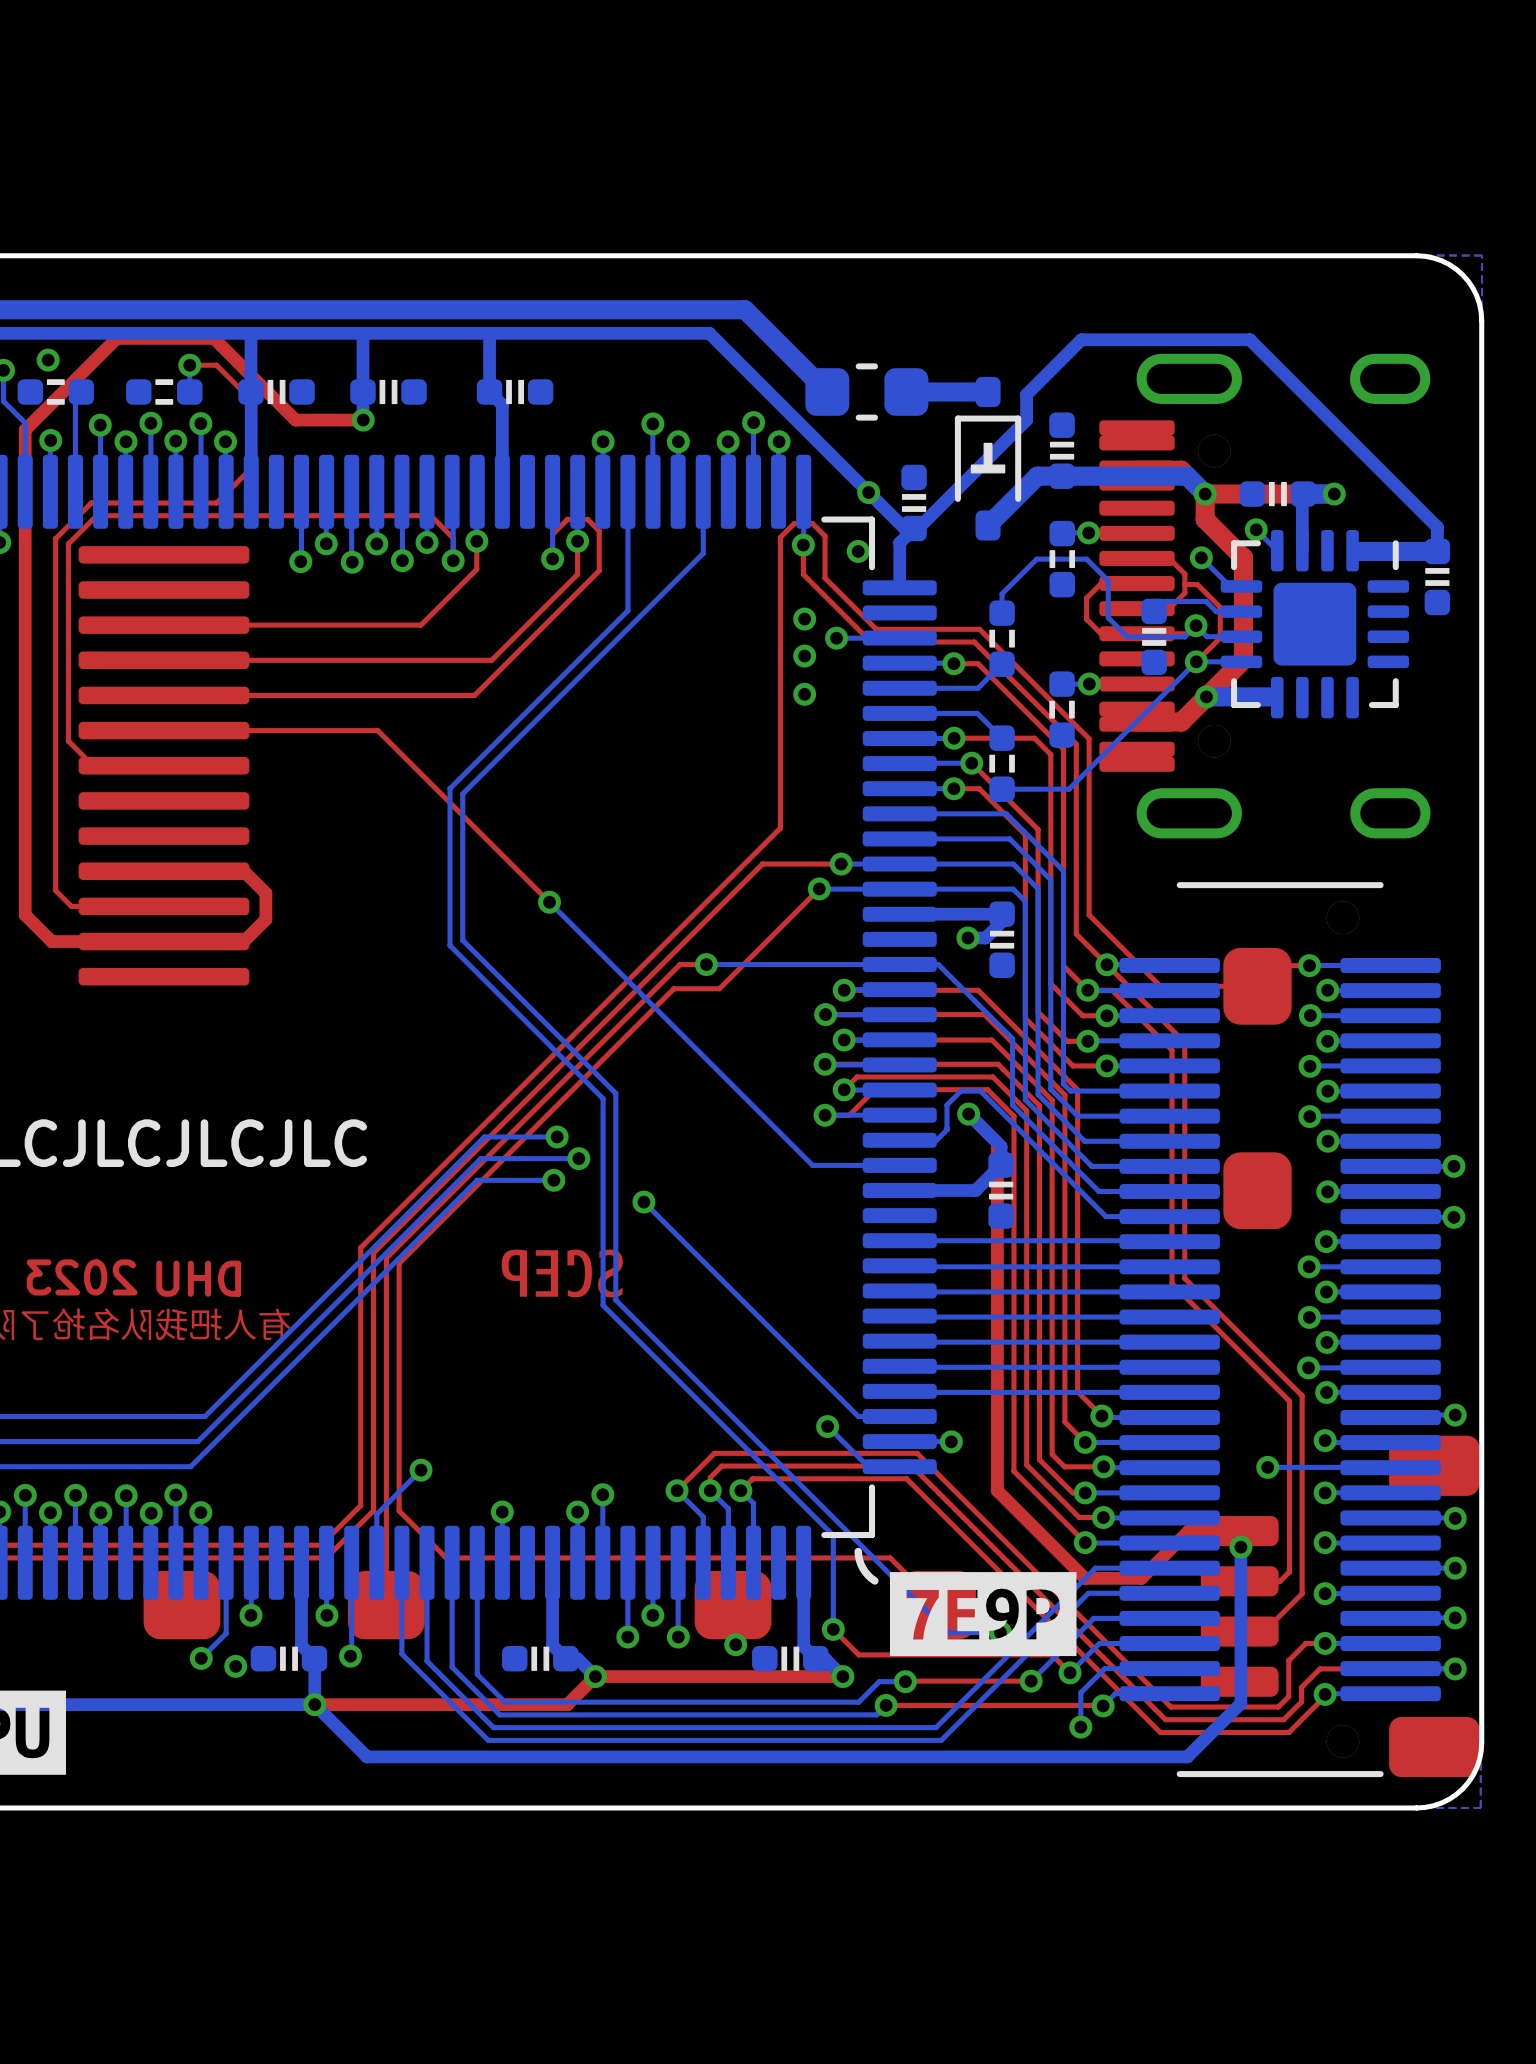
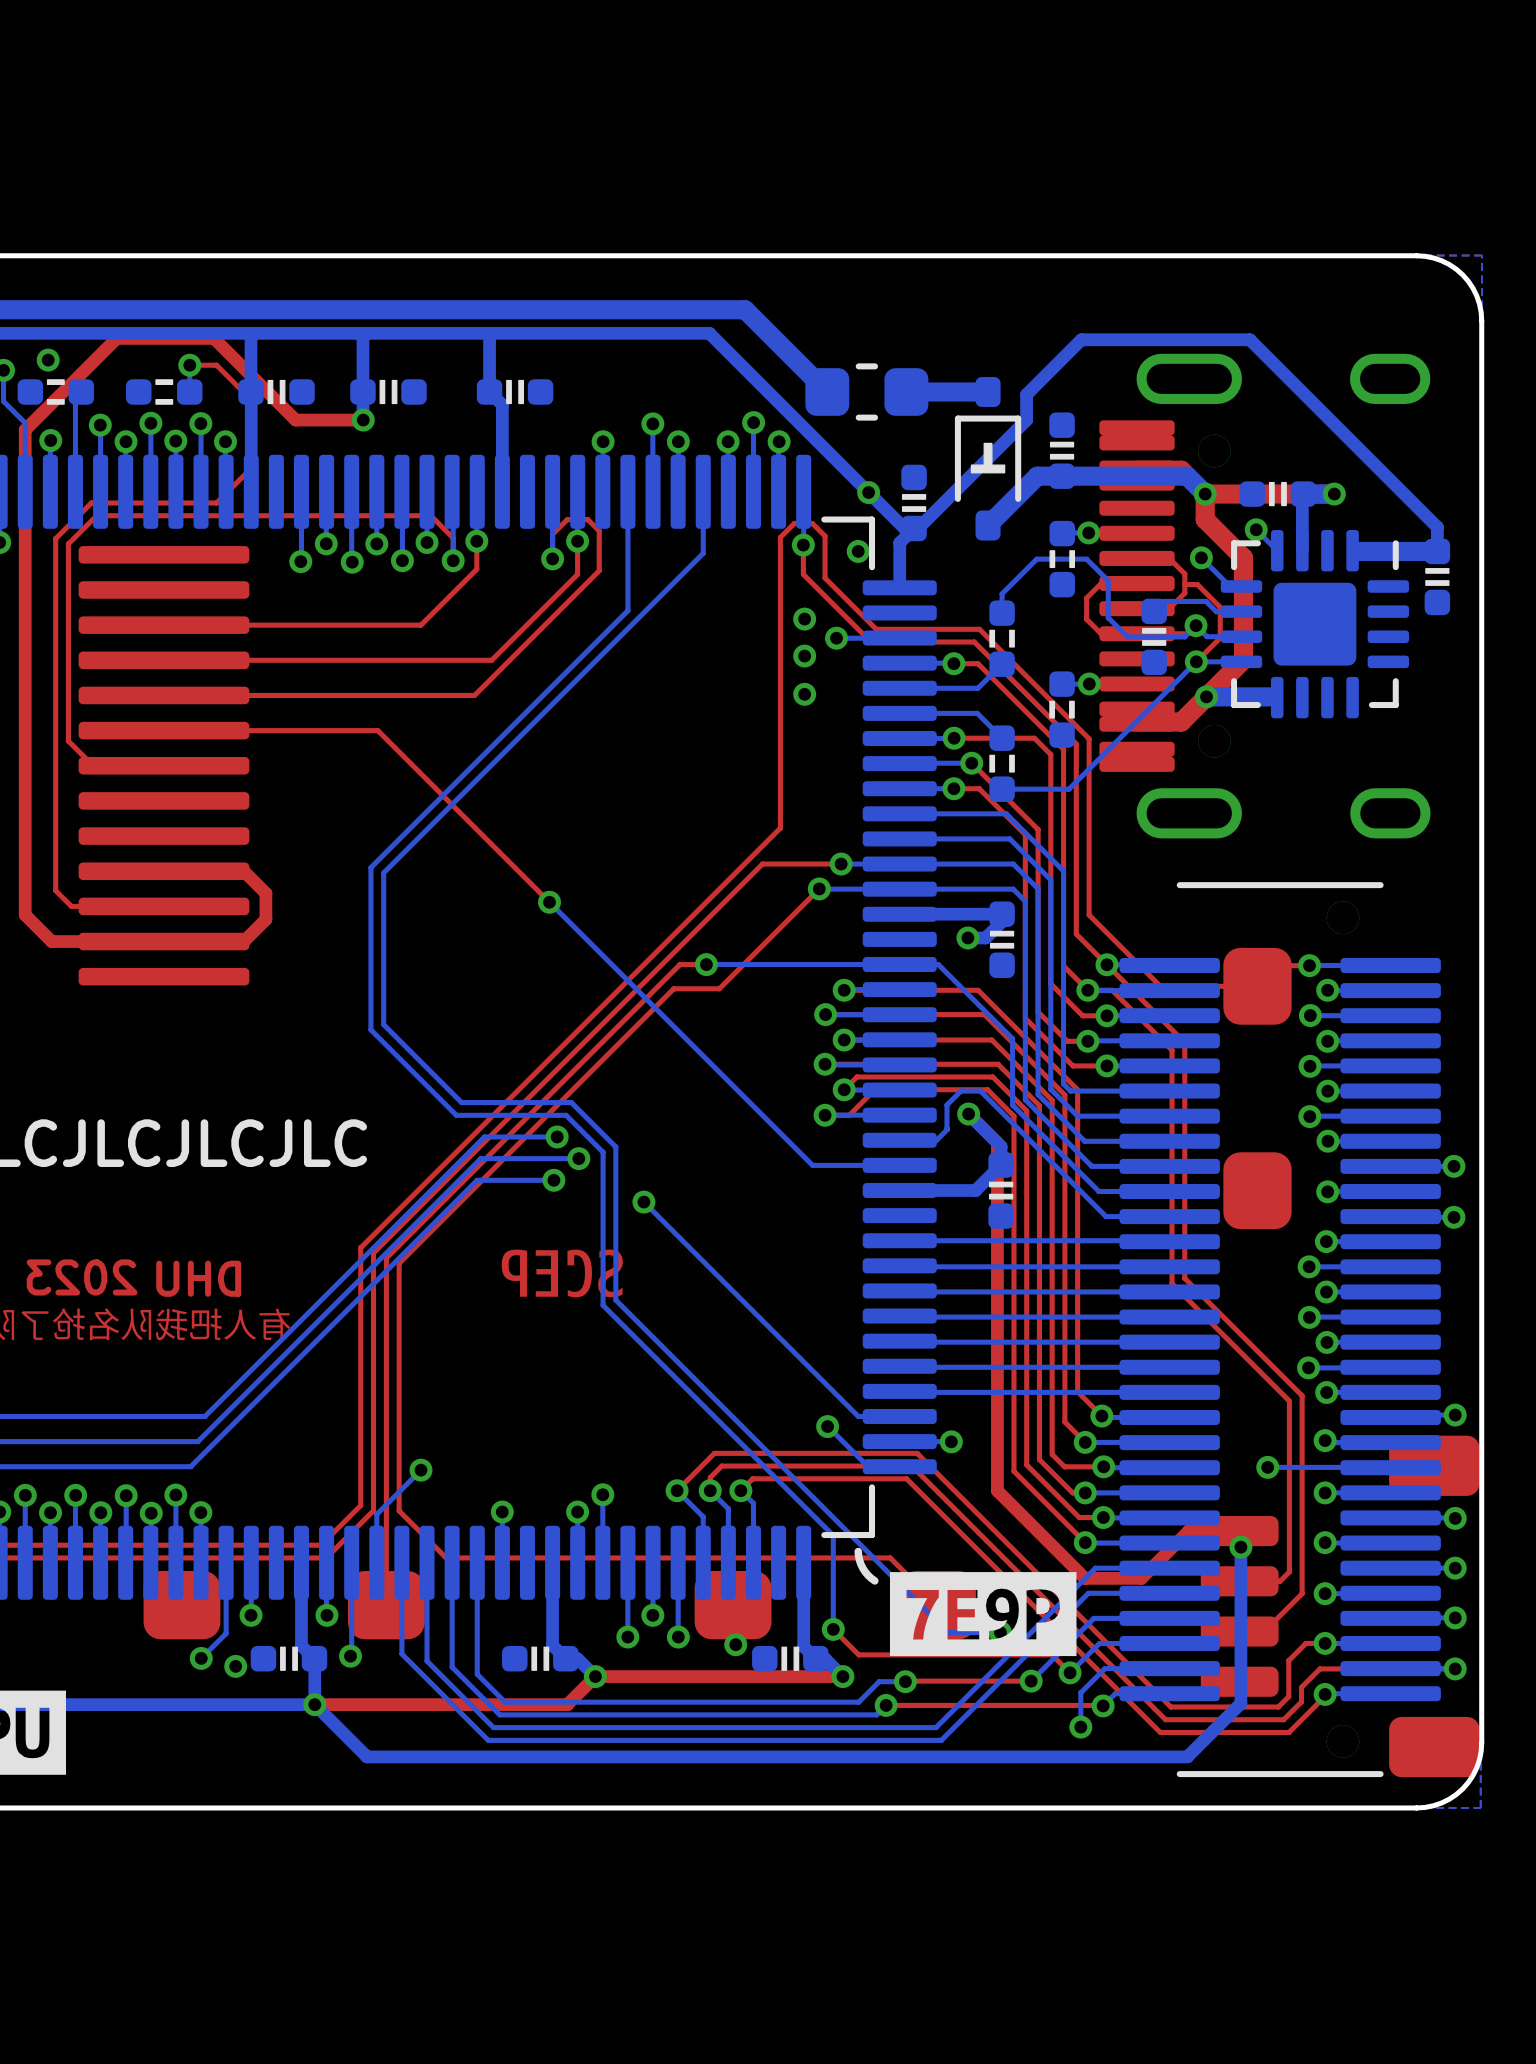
bottom track: (450, 788) (450, 945) (603, 1098) (603, 1152) -> (450, 788) (370, 867) (370, 1029) (456, 1115) (566, 1115) (603, 1152)
bottom track: (462, 793) (462, 940) (615, 1093) (615, 1146) -> (462, 793) (383, 872) (383, 1024) (461, 1102) (571, 1102) (615, 1146)

